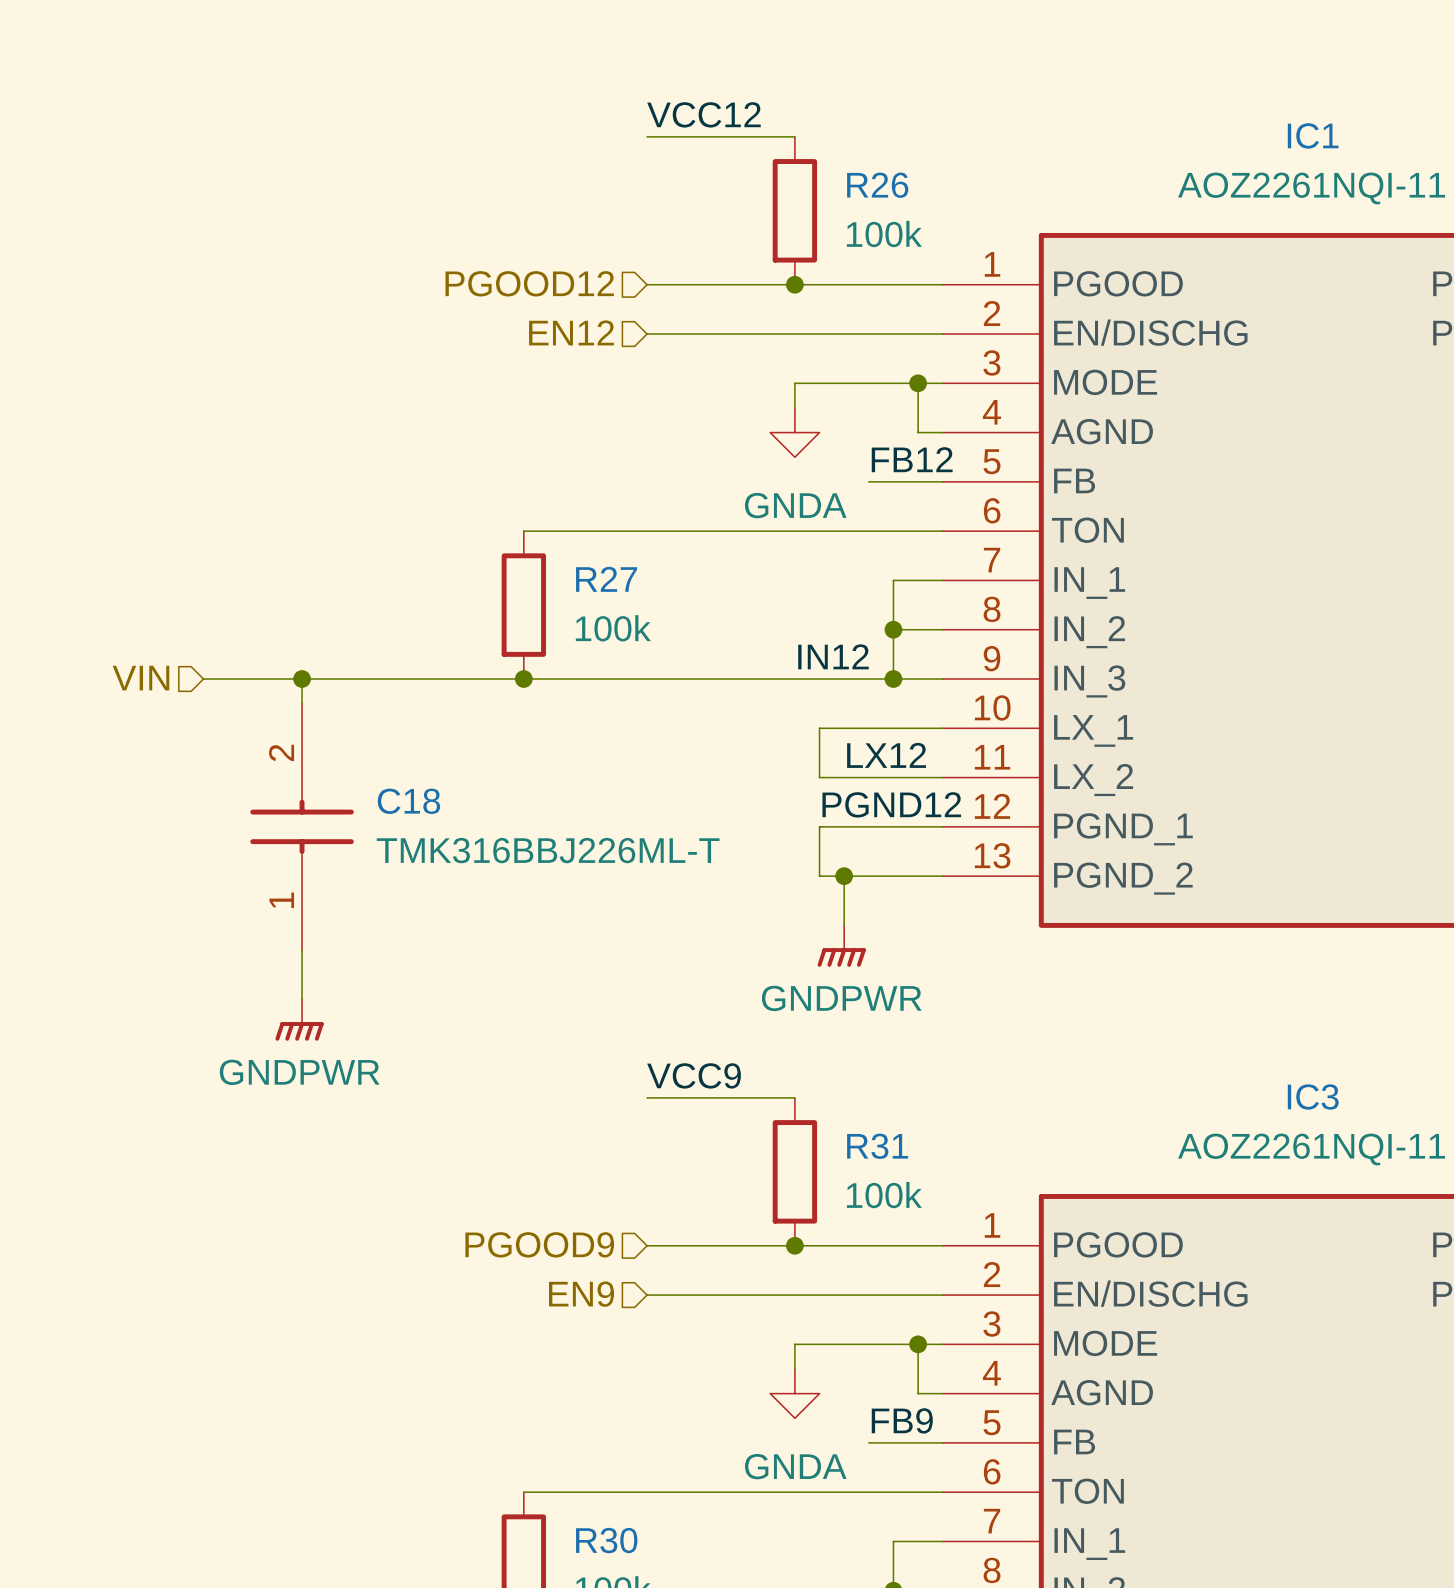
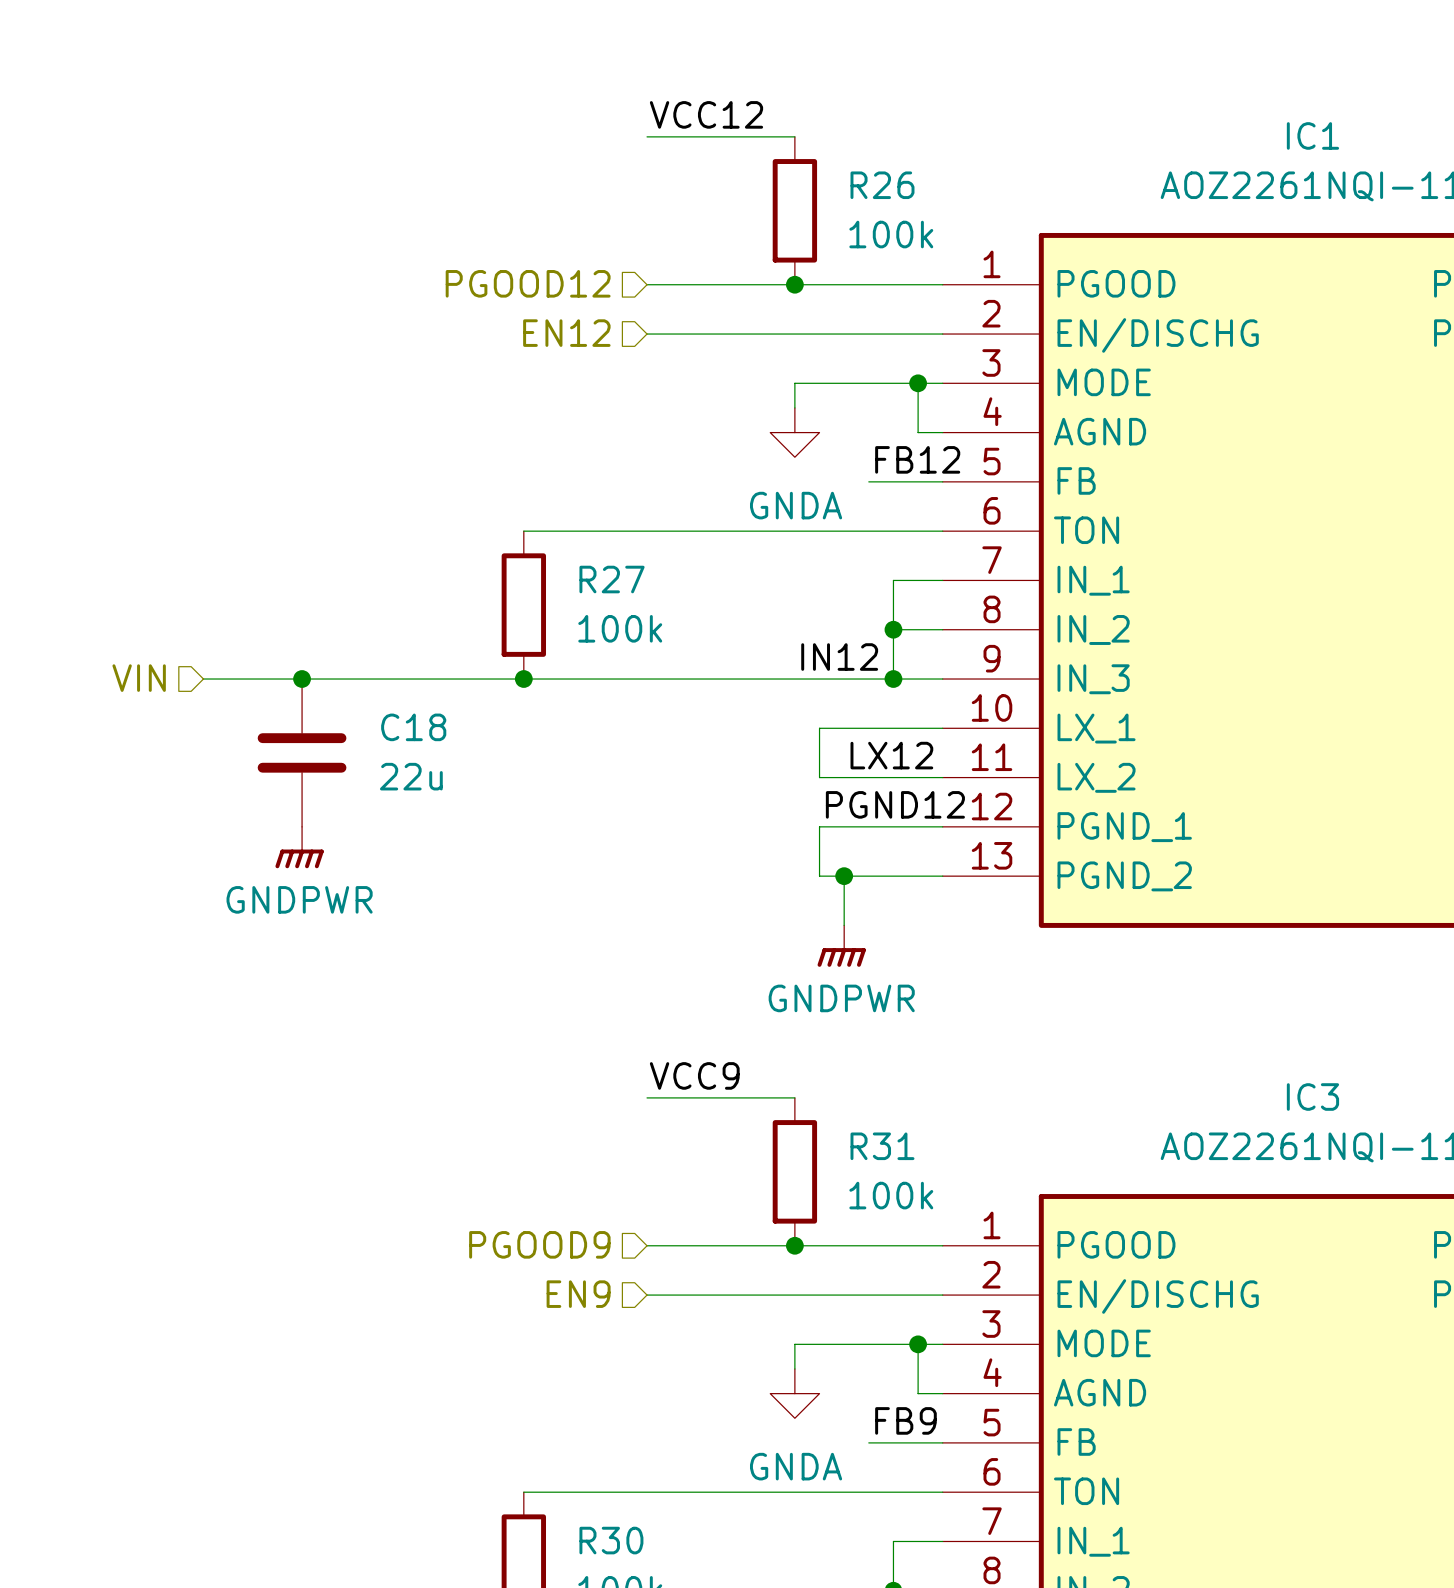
C18 symbol: [250, 703, 354, 951] -> [257, 679, 347, 827]
C18 value: TMK316BBJ226ML-T (548, 850) -> 22u (411, 776)
wire: (302, 950) (302, 999) -> none
power symbol position: GNDPWR (299, 1020) -> GNDPWR (299, 847)

